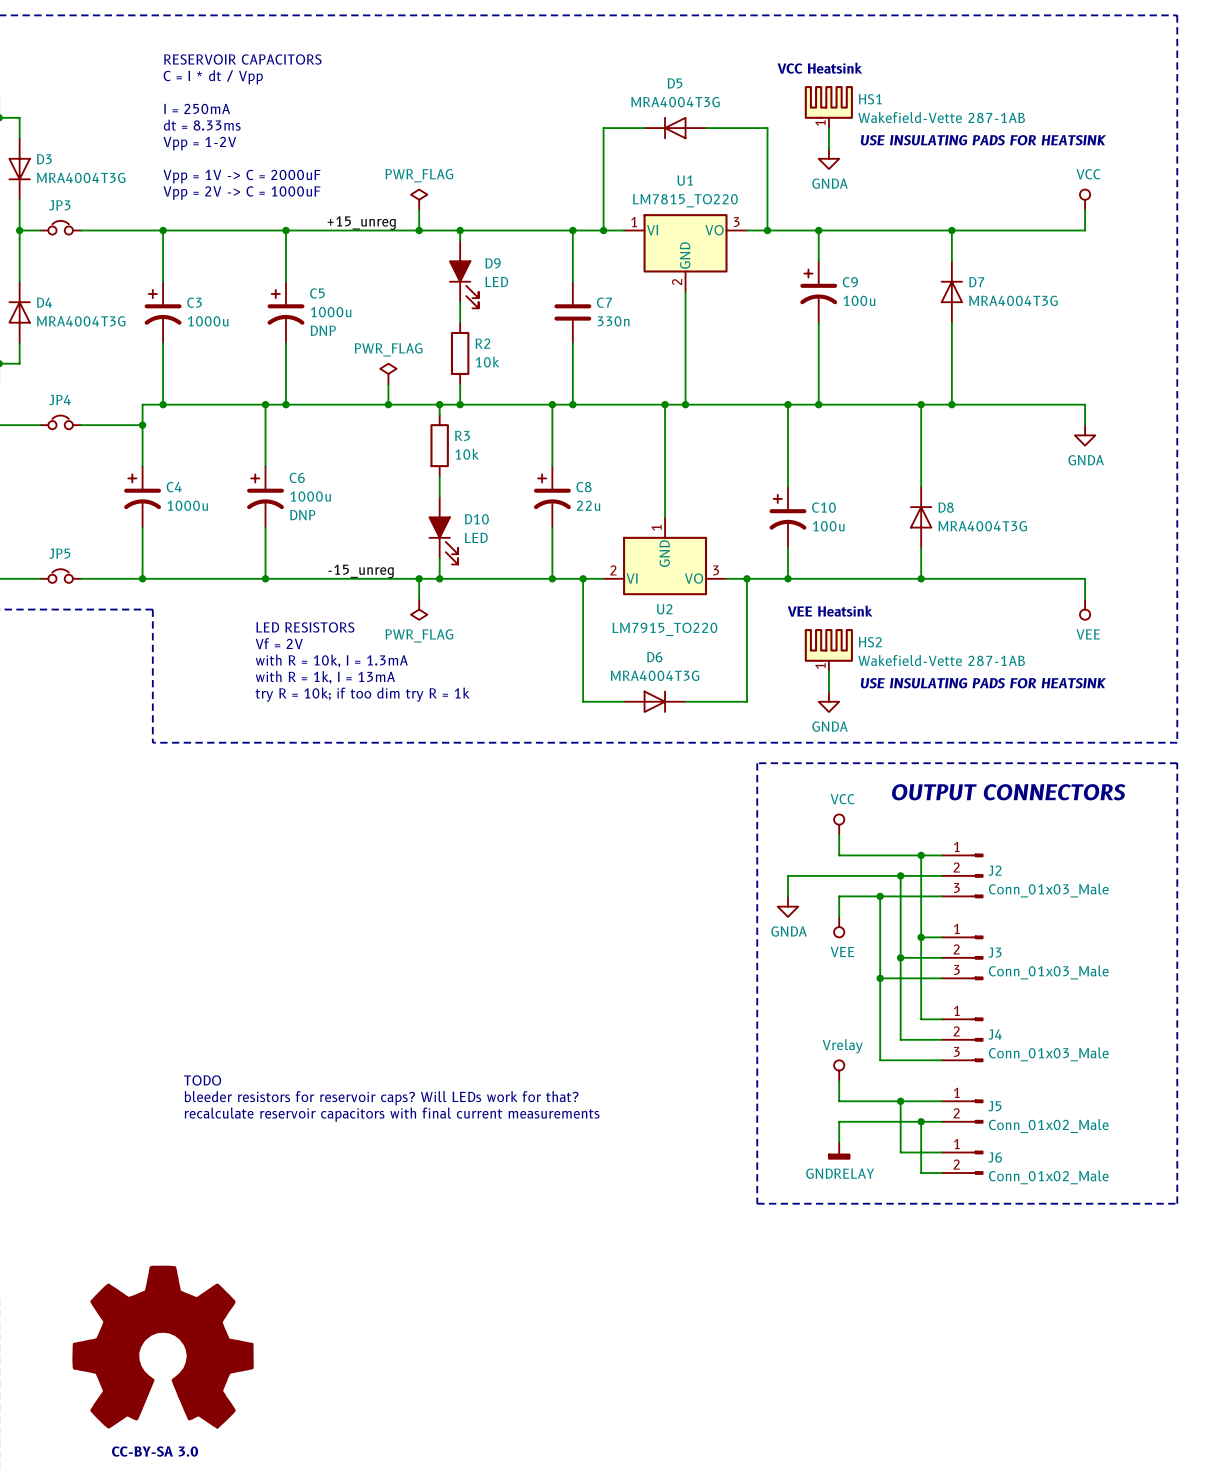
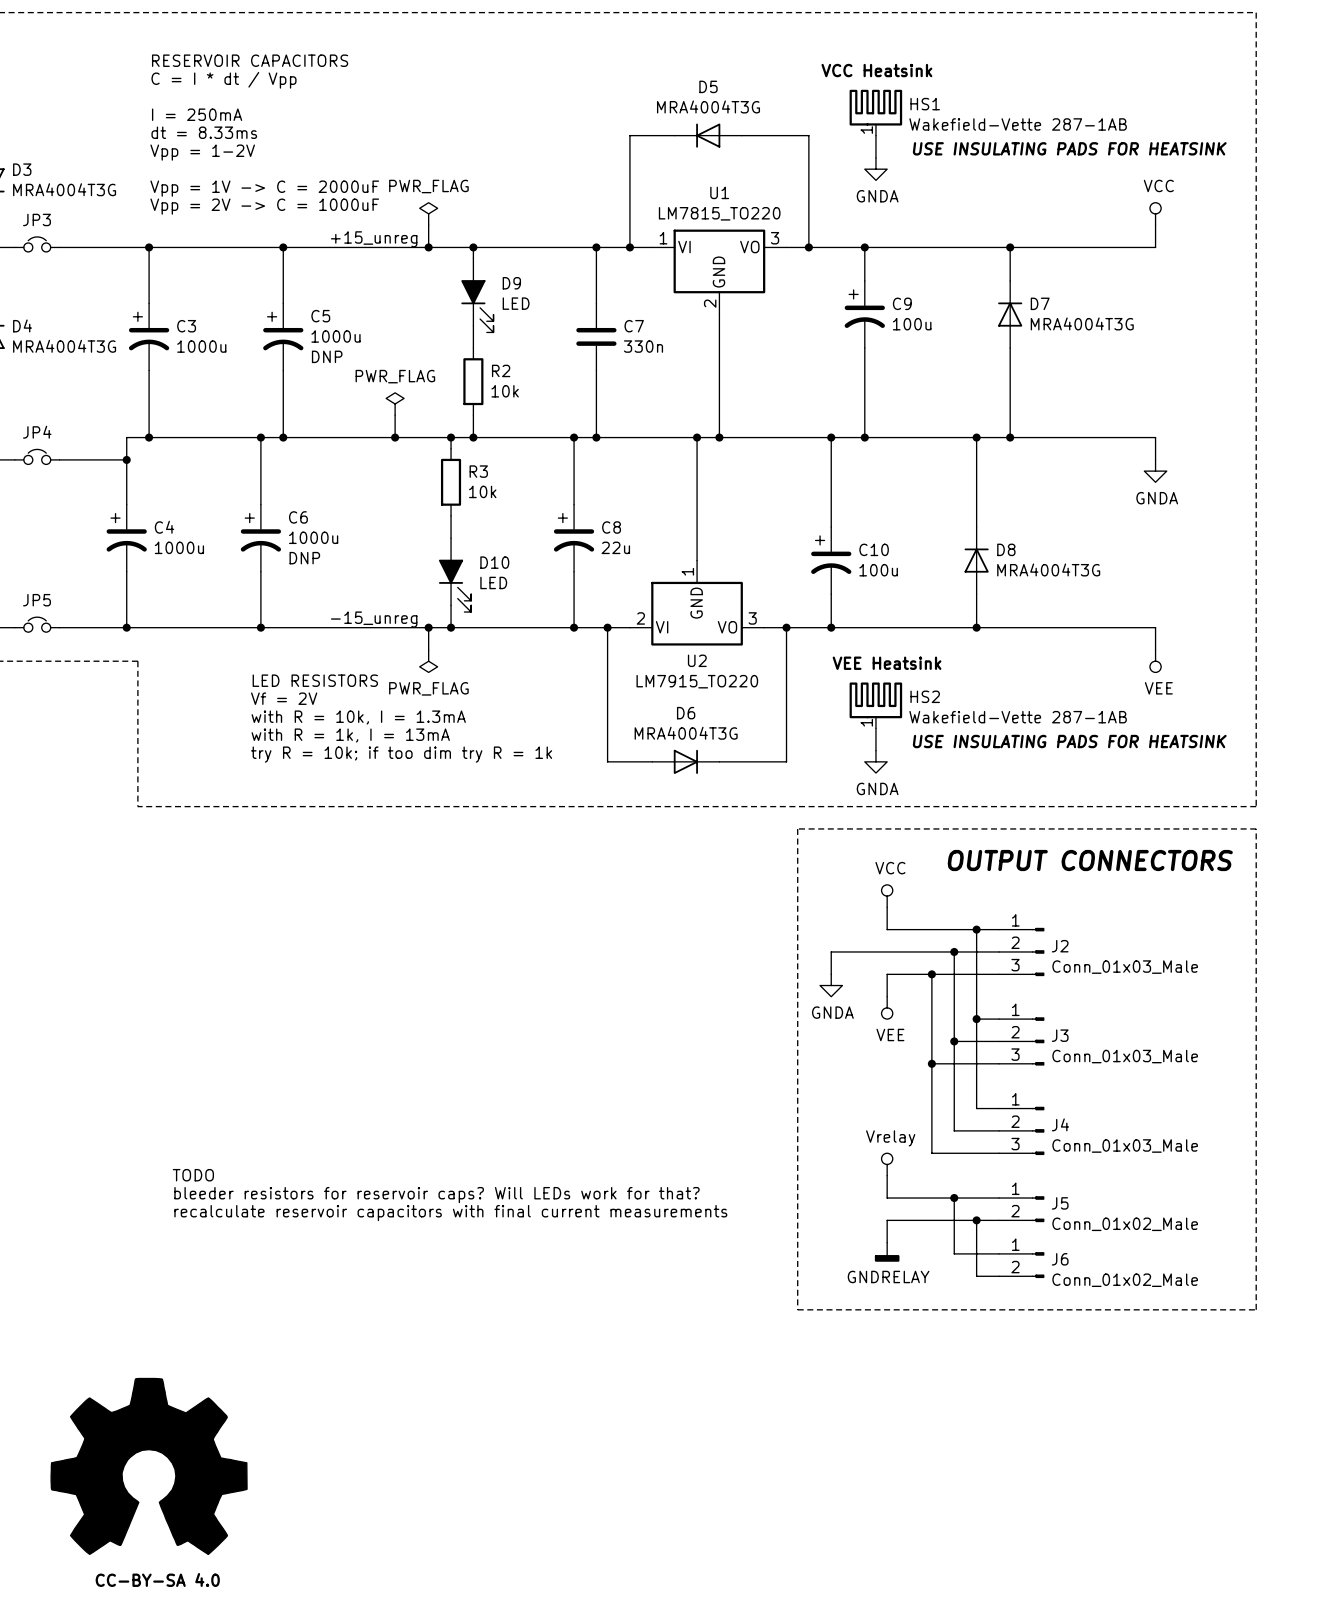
text: CC-BY-SA 3.0 (155, 1451) -> CC-BY-SA 4.0 (157, 1579)

